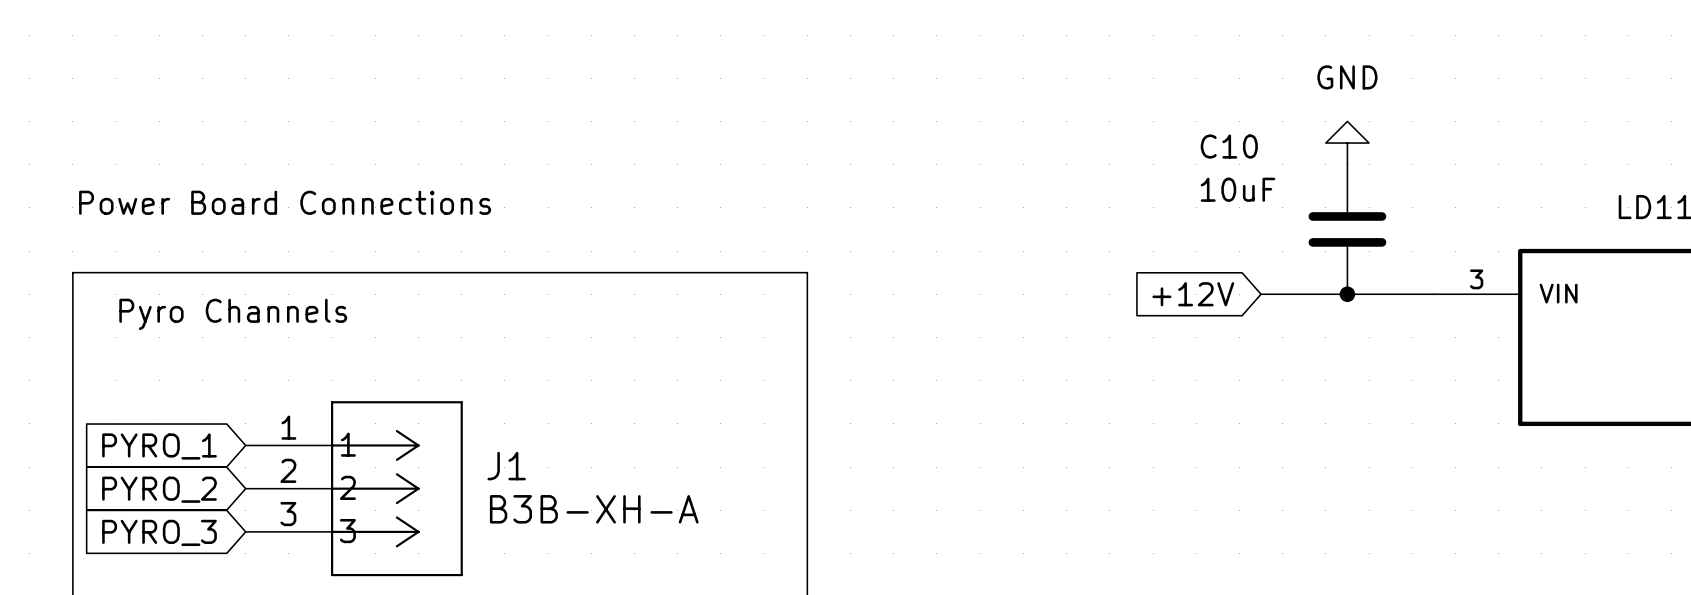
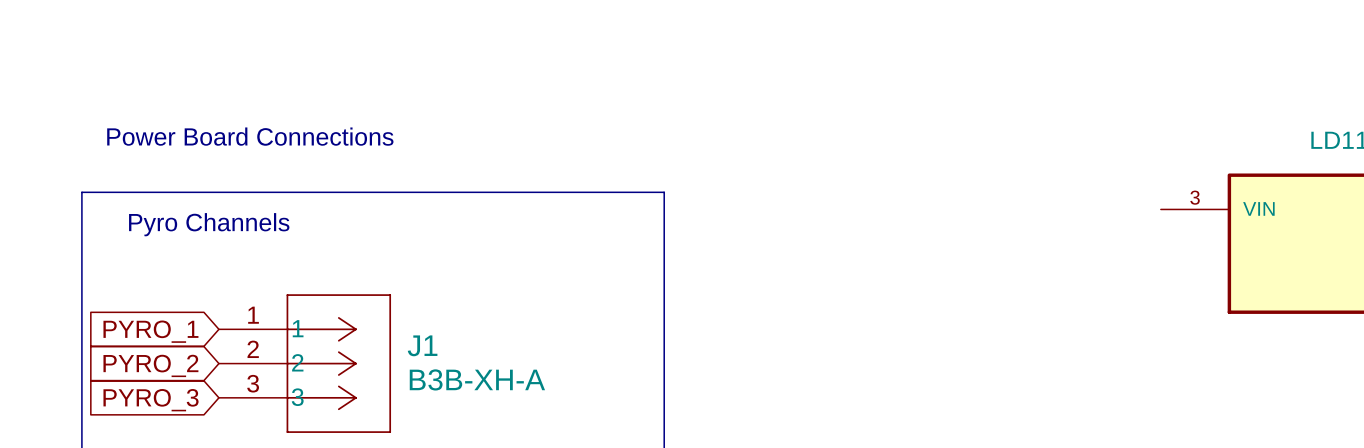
power symbol: GND (1347, 143) -> none
C10: 10uF (1347, 229) -> none
global label: +12V (1193, 294) -> none
wire: (1261, 294) (1433, 294) -> none
junction: (1347, 294) -> none

